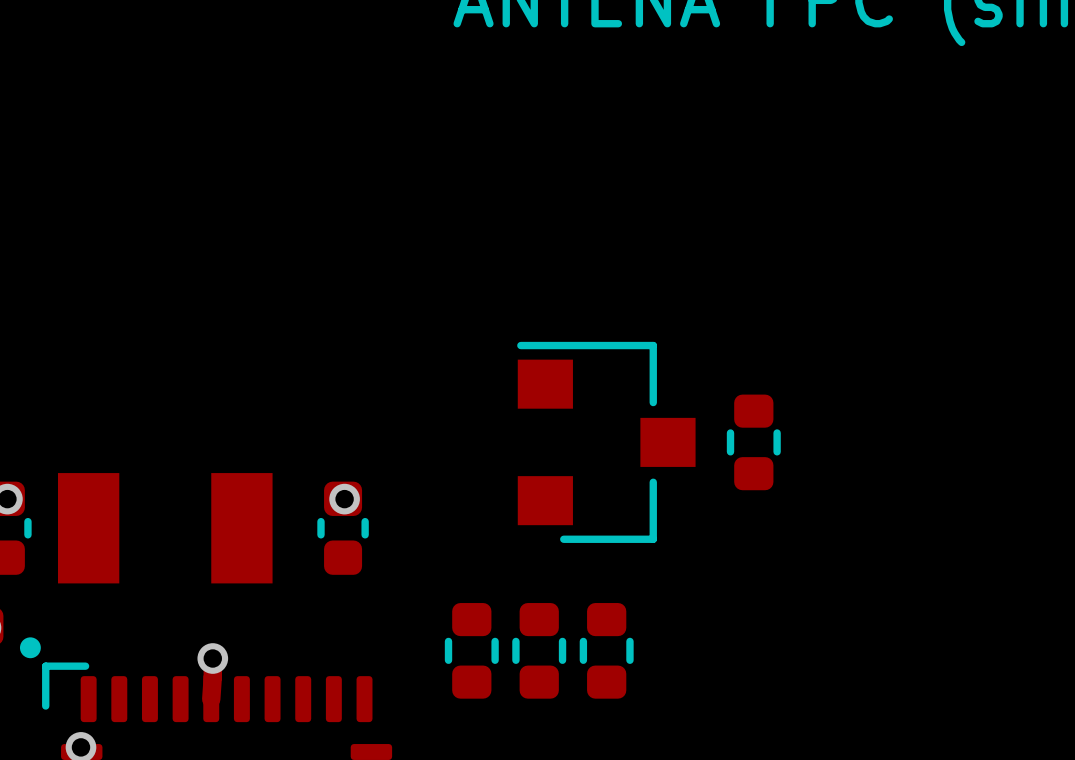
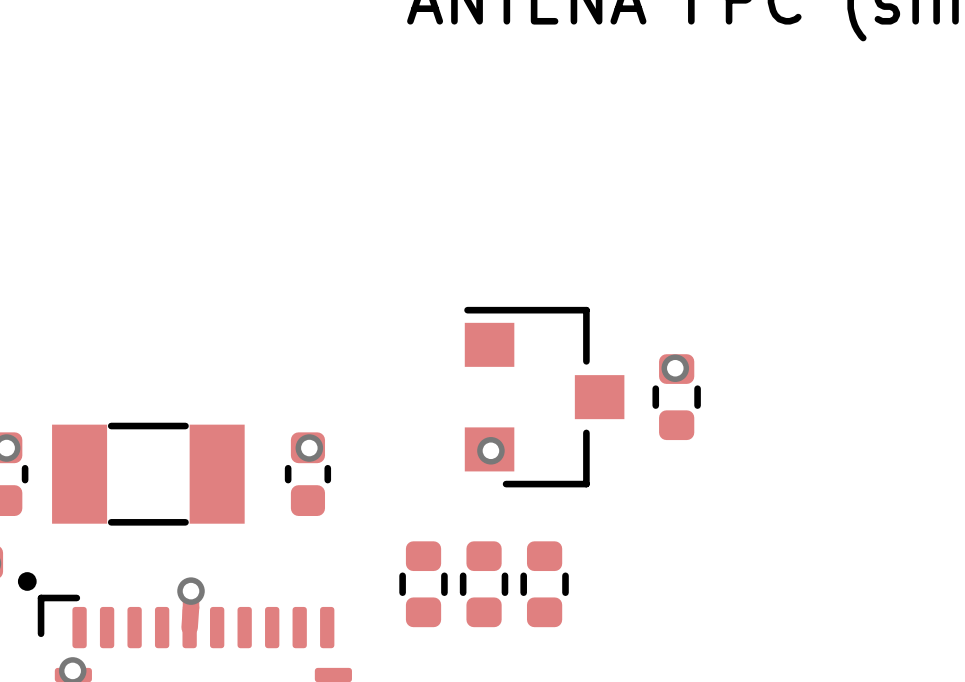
via: none -> (675, 368)
part footprint: [57, 473, 273, 584] -> [52, 422, 245, 526]
via: none -> (490, 450)

